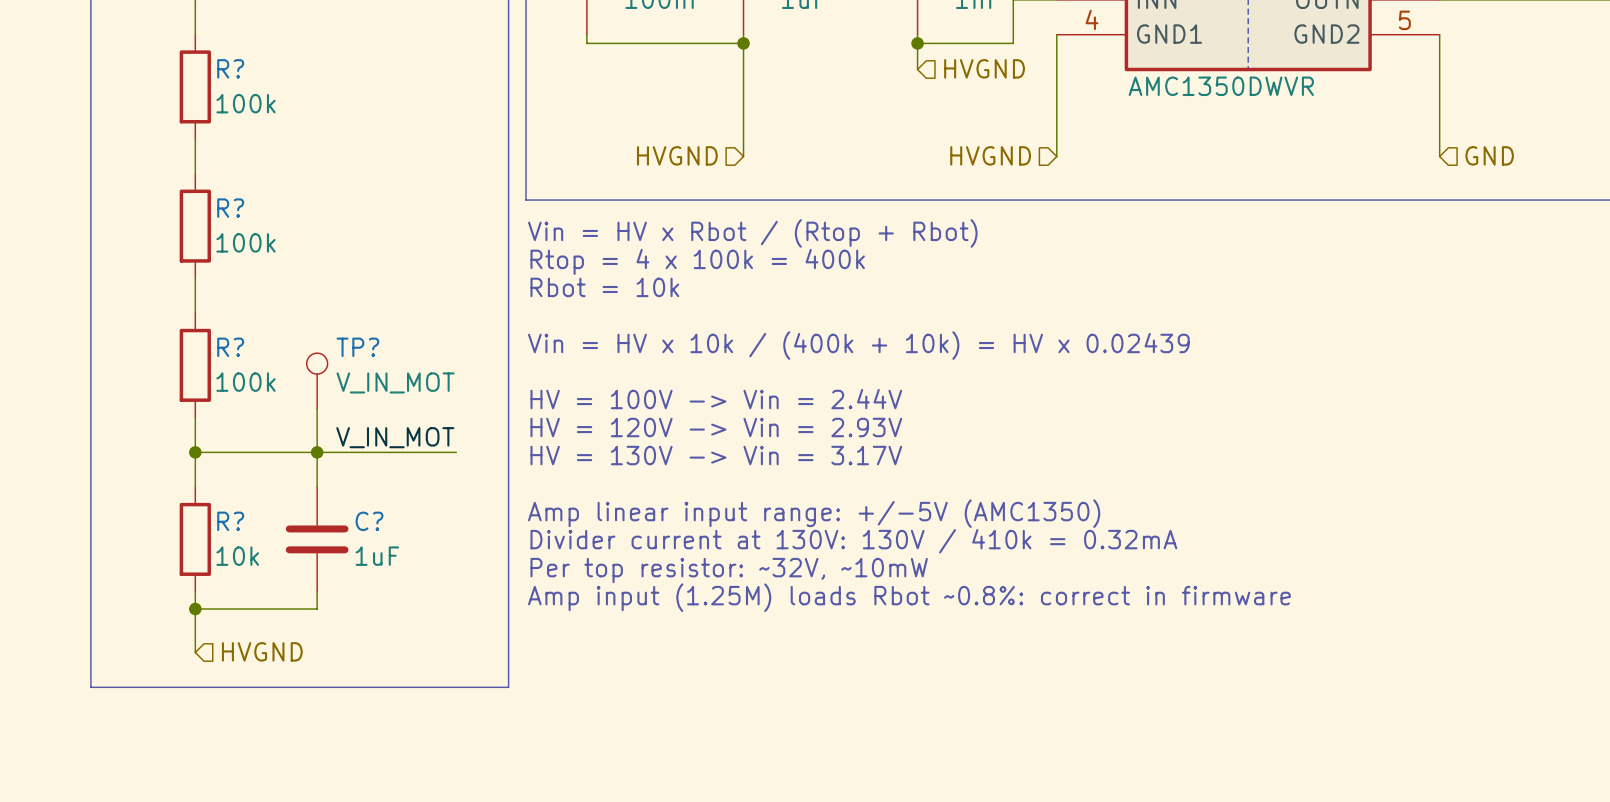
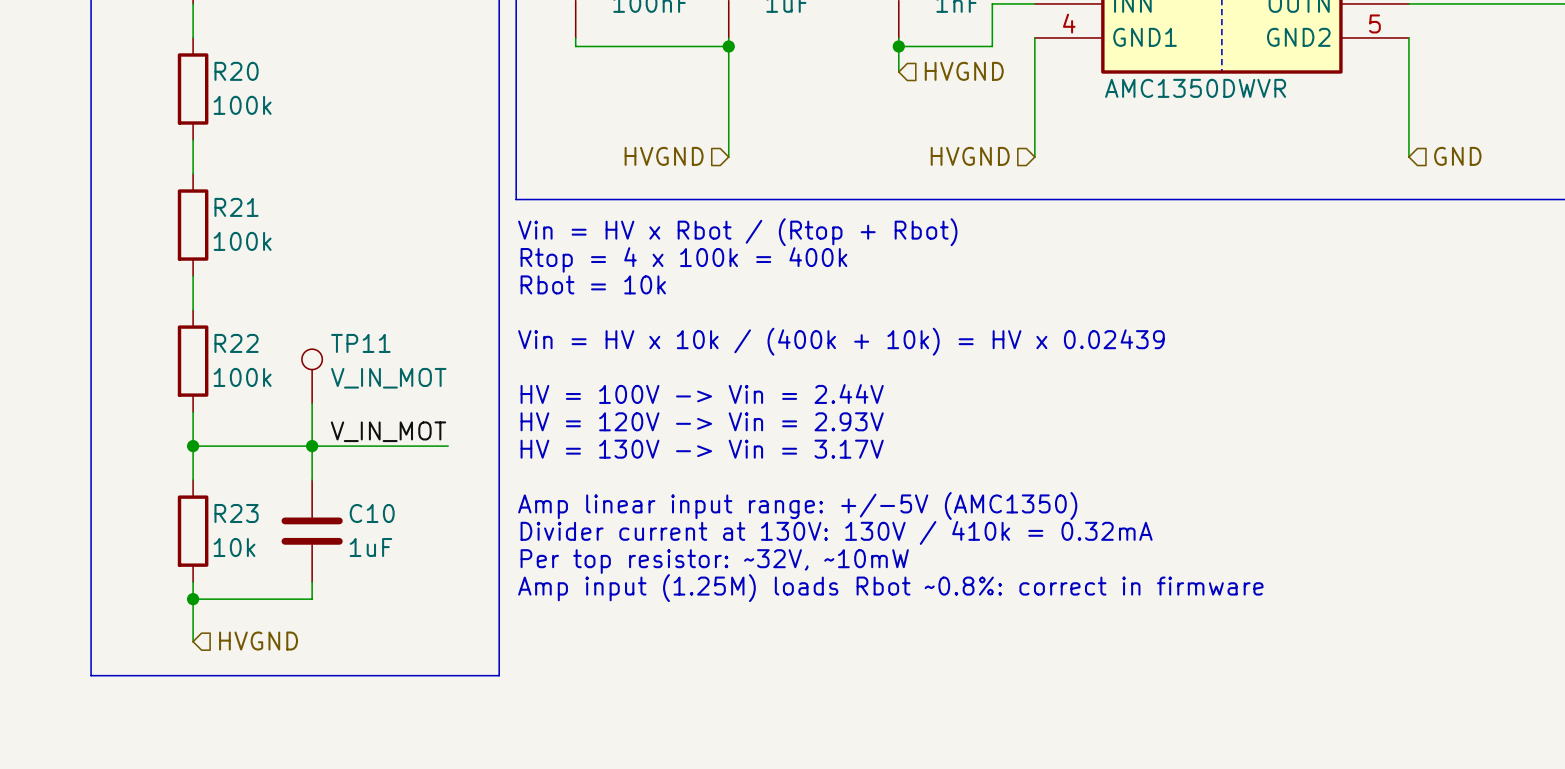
R? name: R? (230, 68) -> R20 (236, 71)
R? name: R? (230, 208) -> R21 (236, 207)
R? name: R? (230, 347) -> R22 (236, 343)
TP? name: TP? (357, 347) -> TP11 (360, 343)
R? name: R? (230, 521) -> R23 (236, 513)
C? name: C? (369, 521) -> C10 (372, 513)

